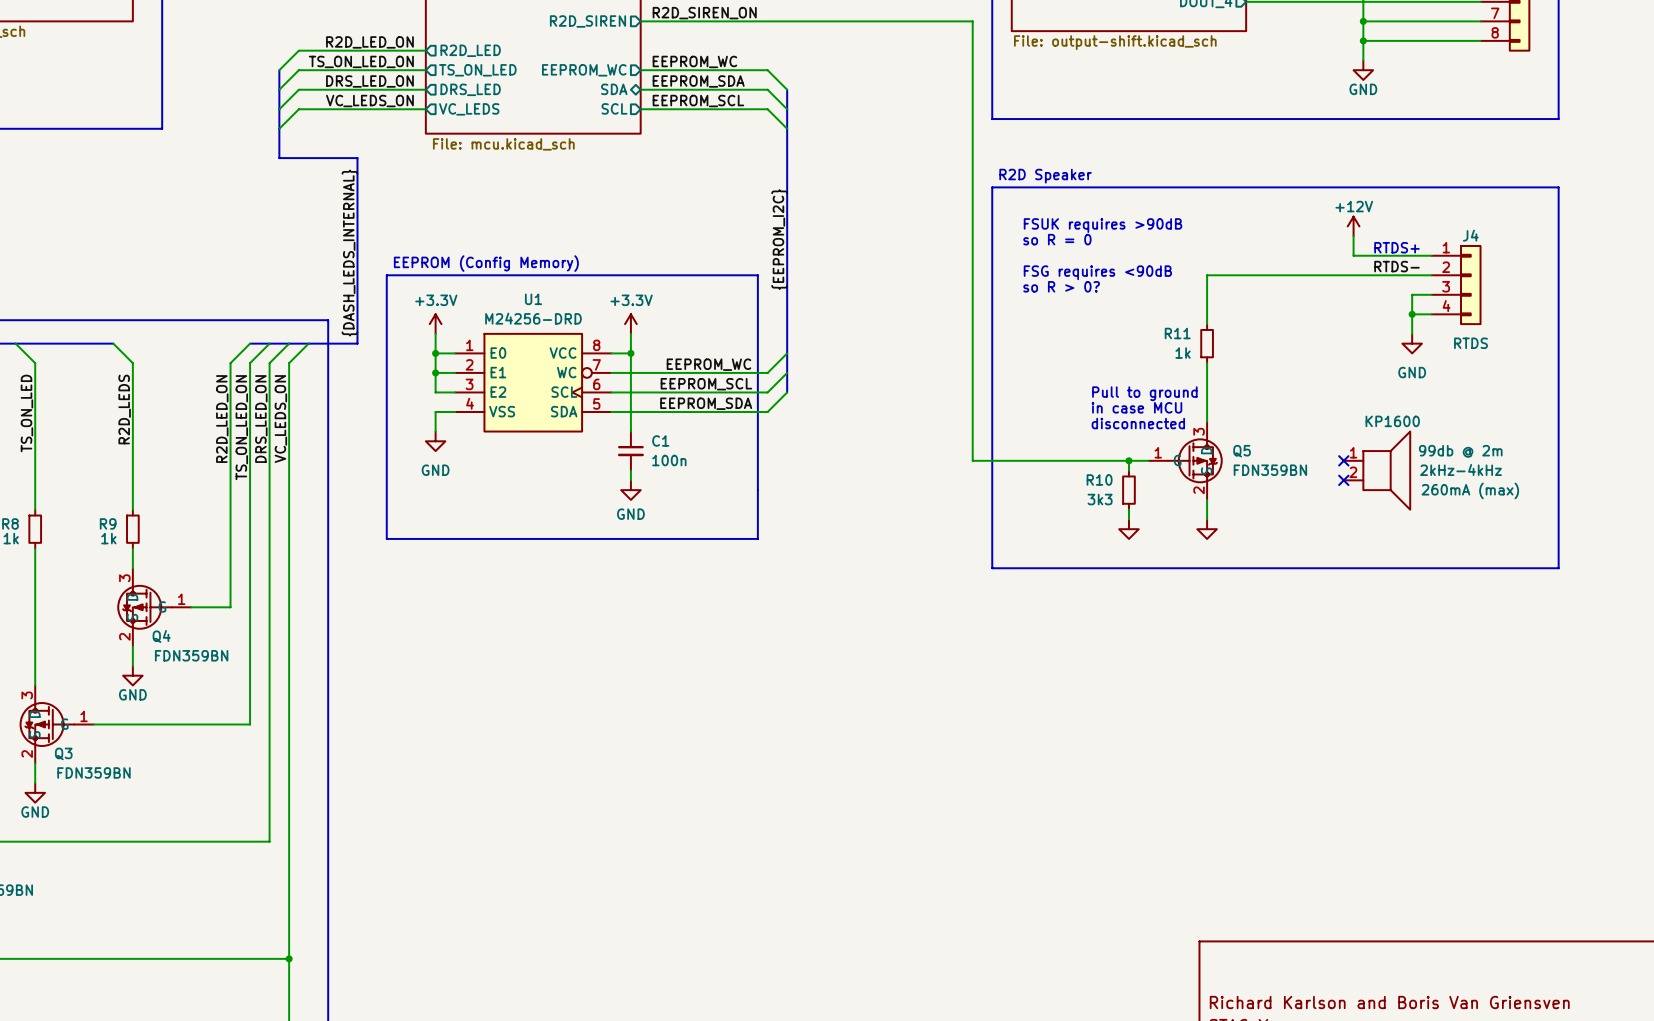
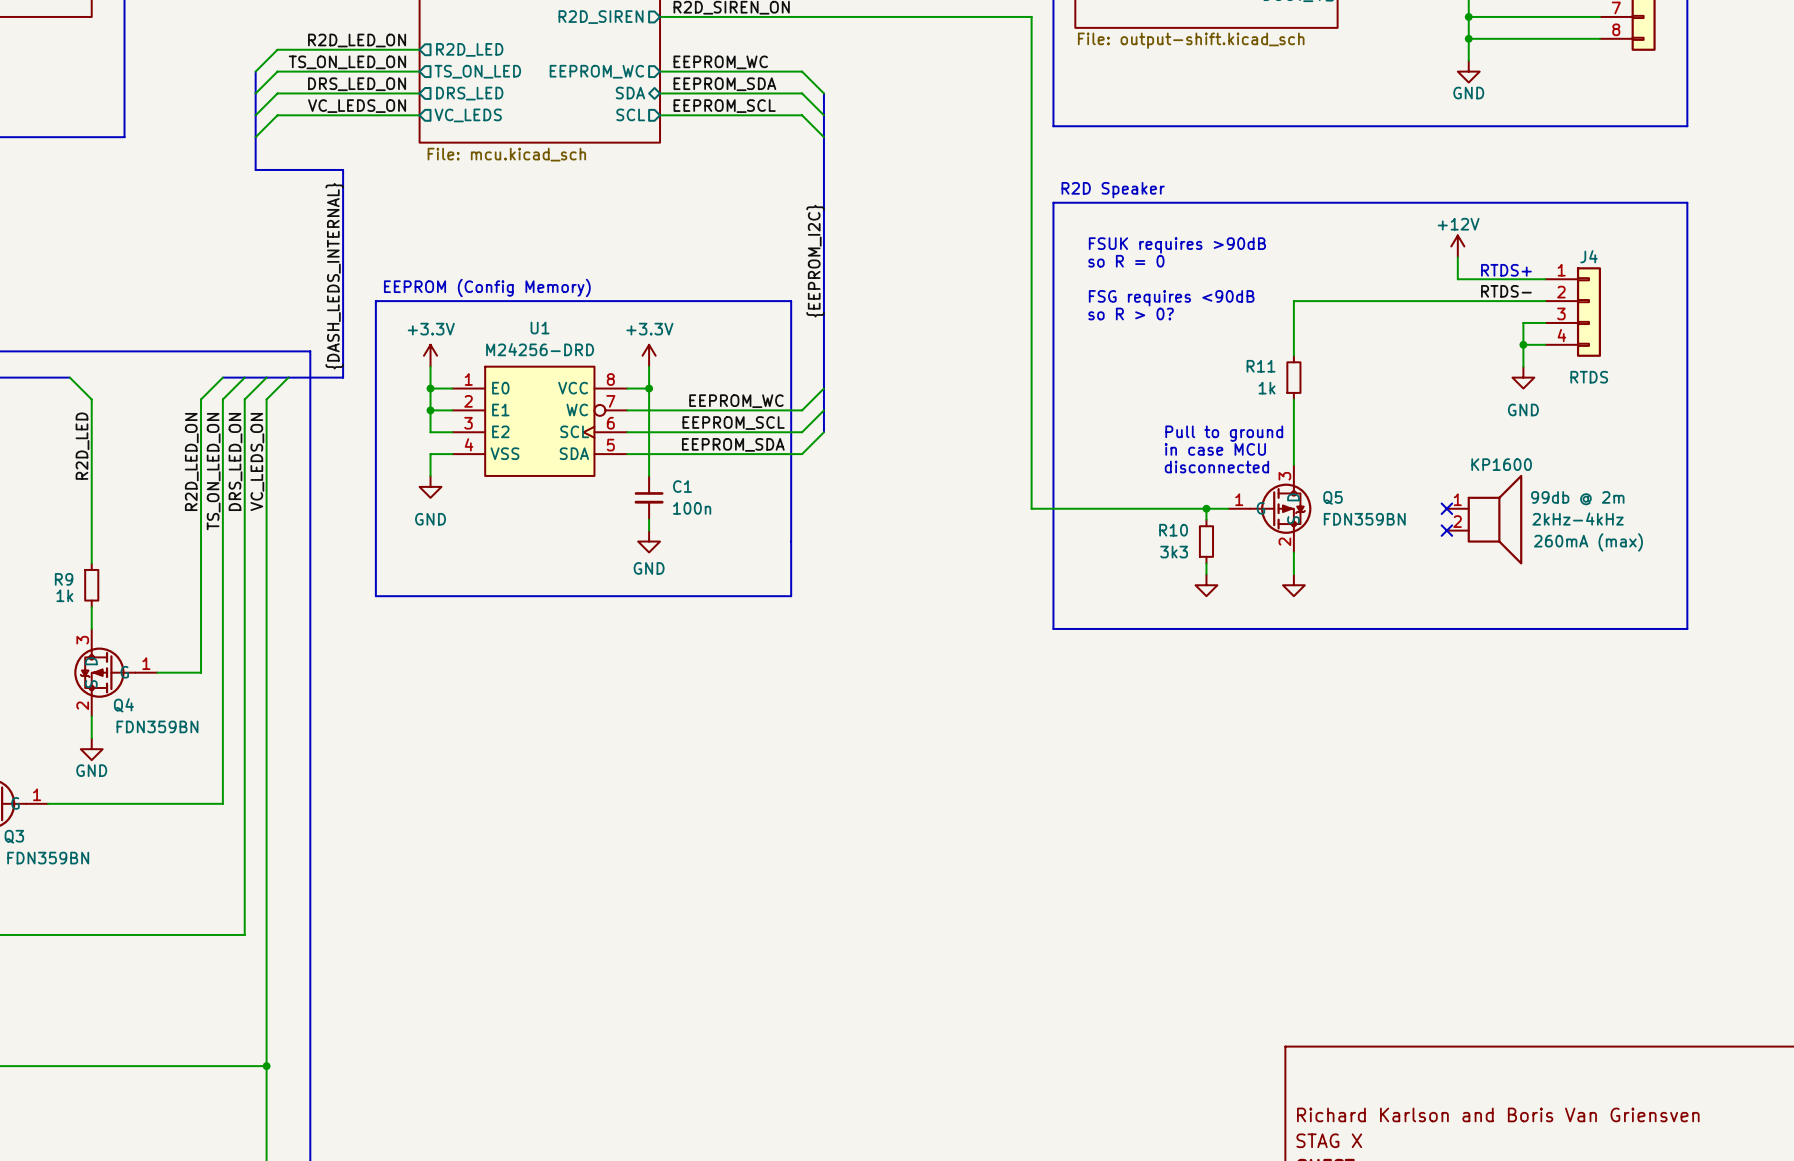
label: R2D_LEDS (124, 409) -> R2D_LED (82, 446)

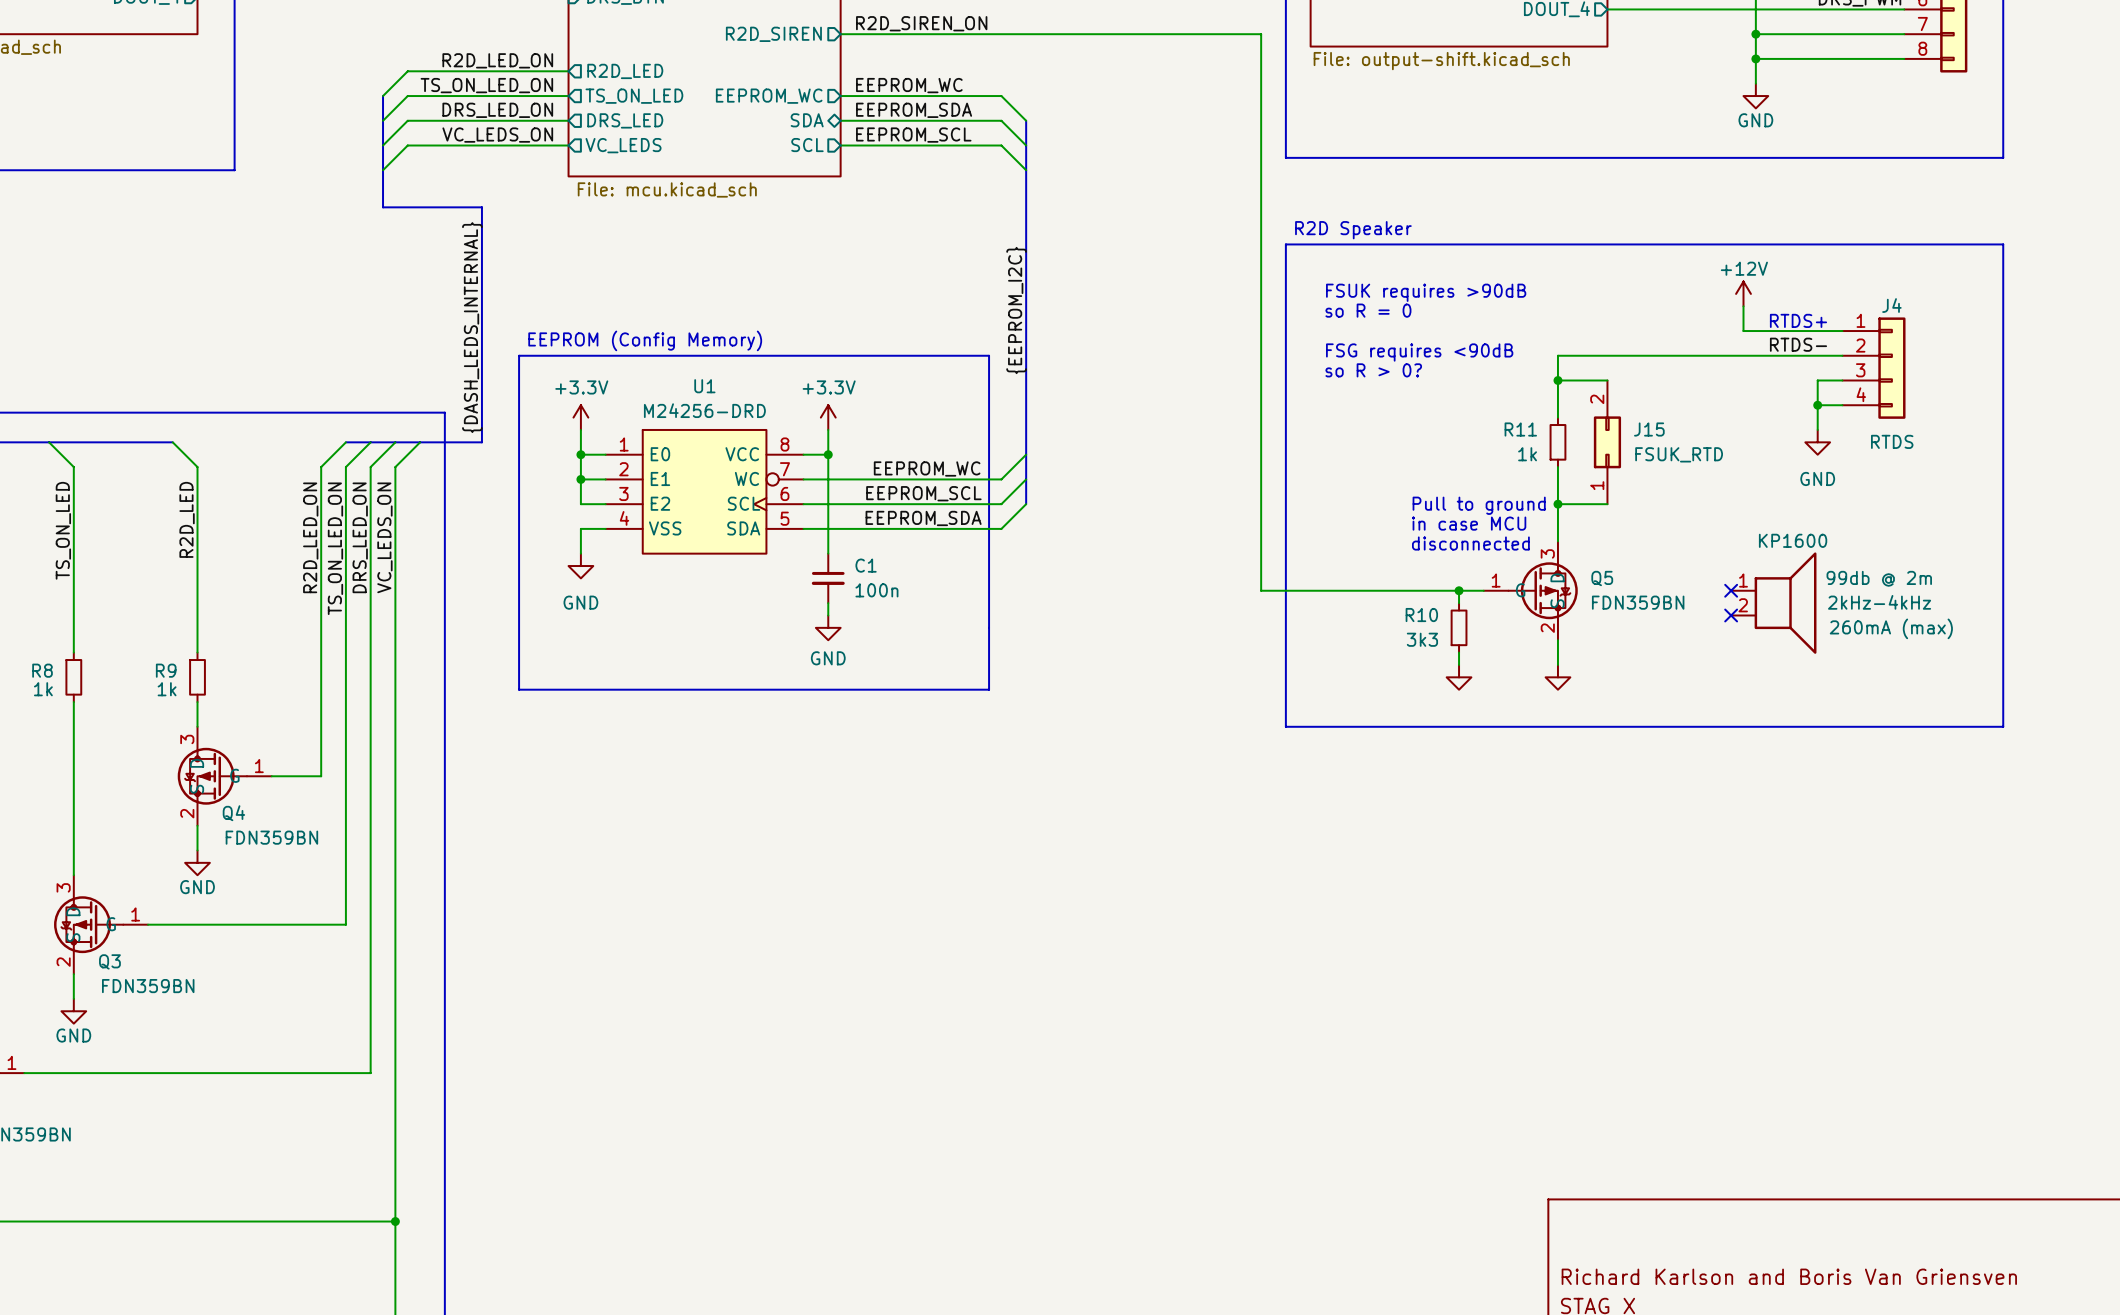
wire: none -> (1557, 380) (1607, 380)
junction: none -> (1557, 380)
J15: none -> FSUK_RTD (1607, 442)
wire: none -> (1557, 504) (1607, 504)
junction: none -> (1557, 504)

